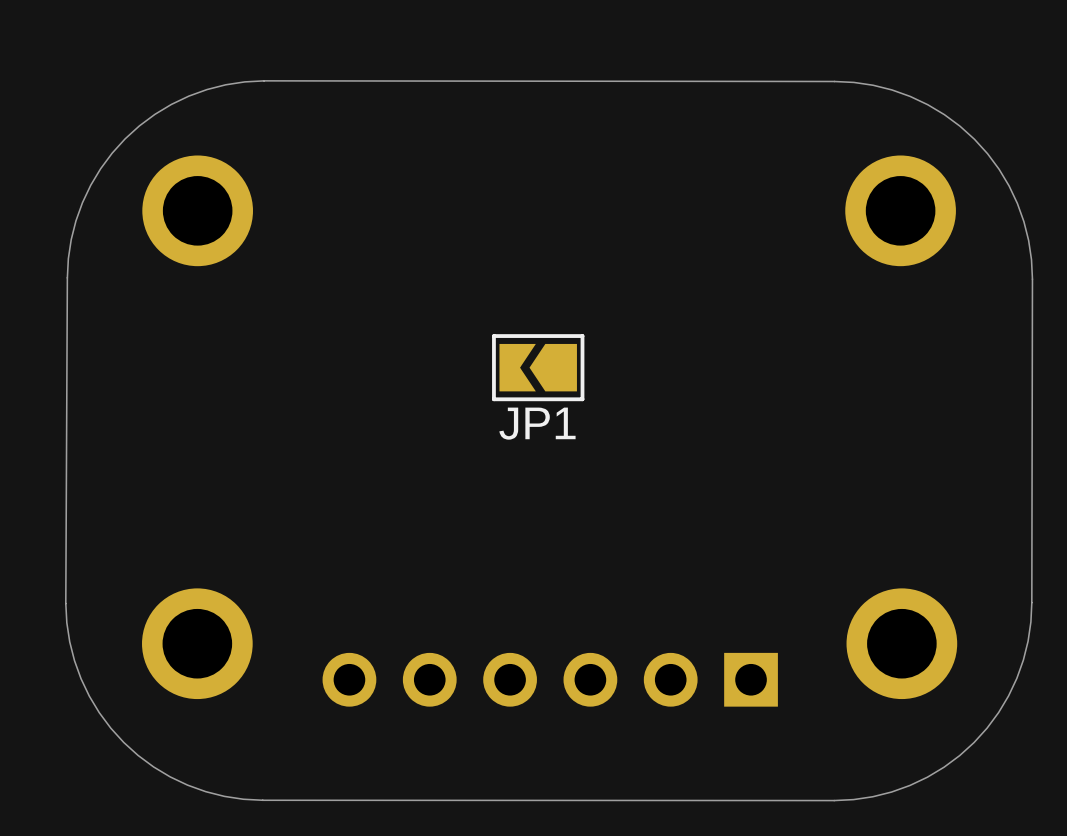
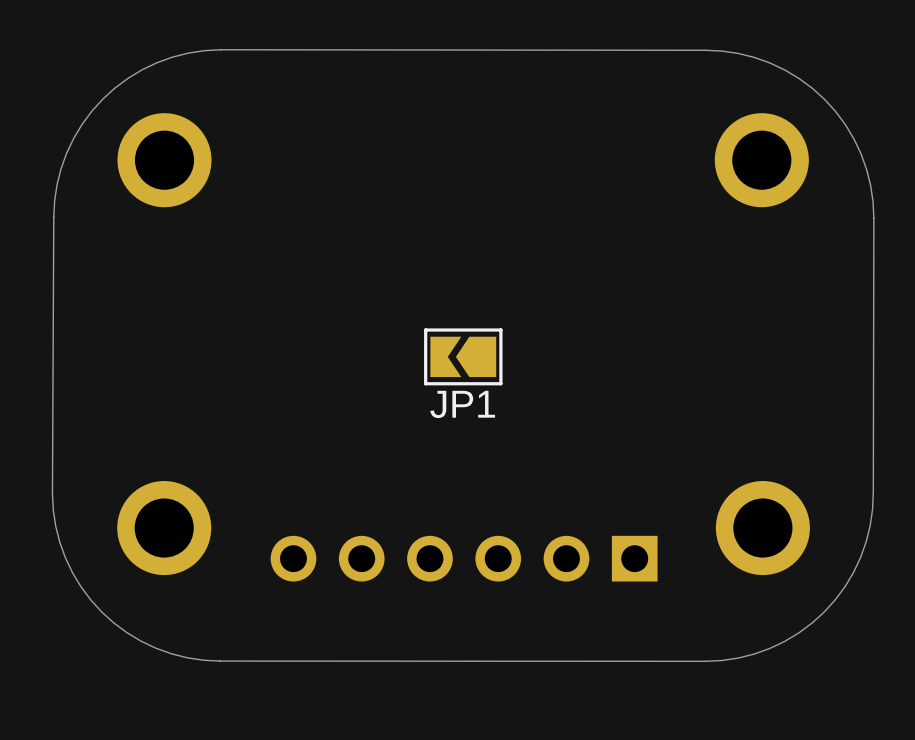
JP1 position: (538, 367) -> (463, 356)

